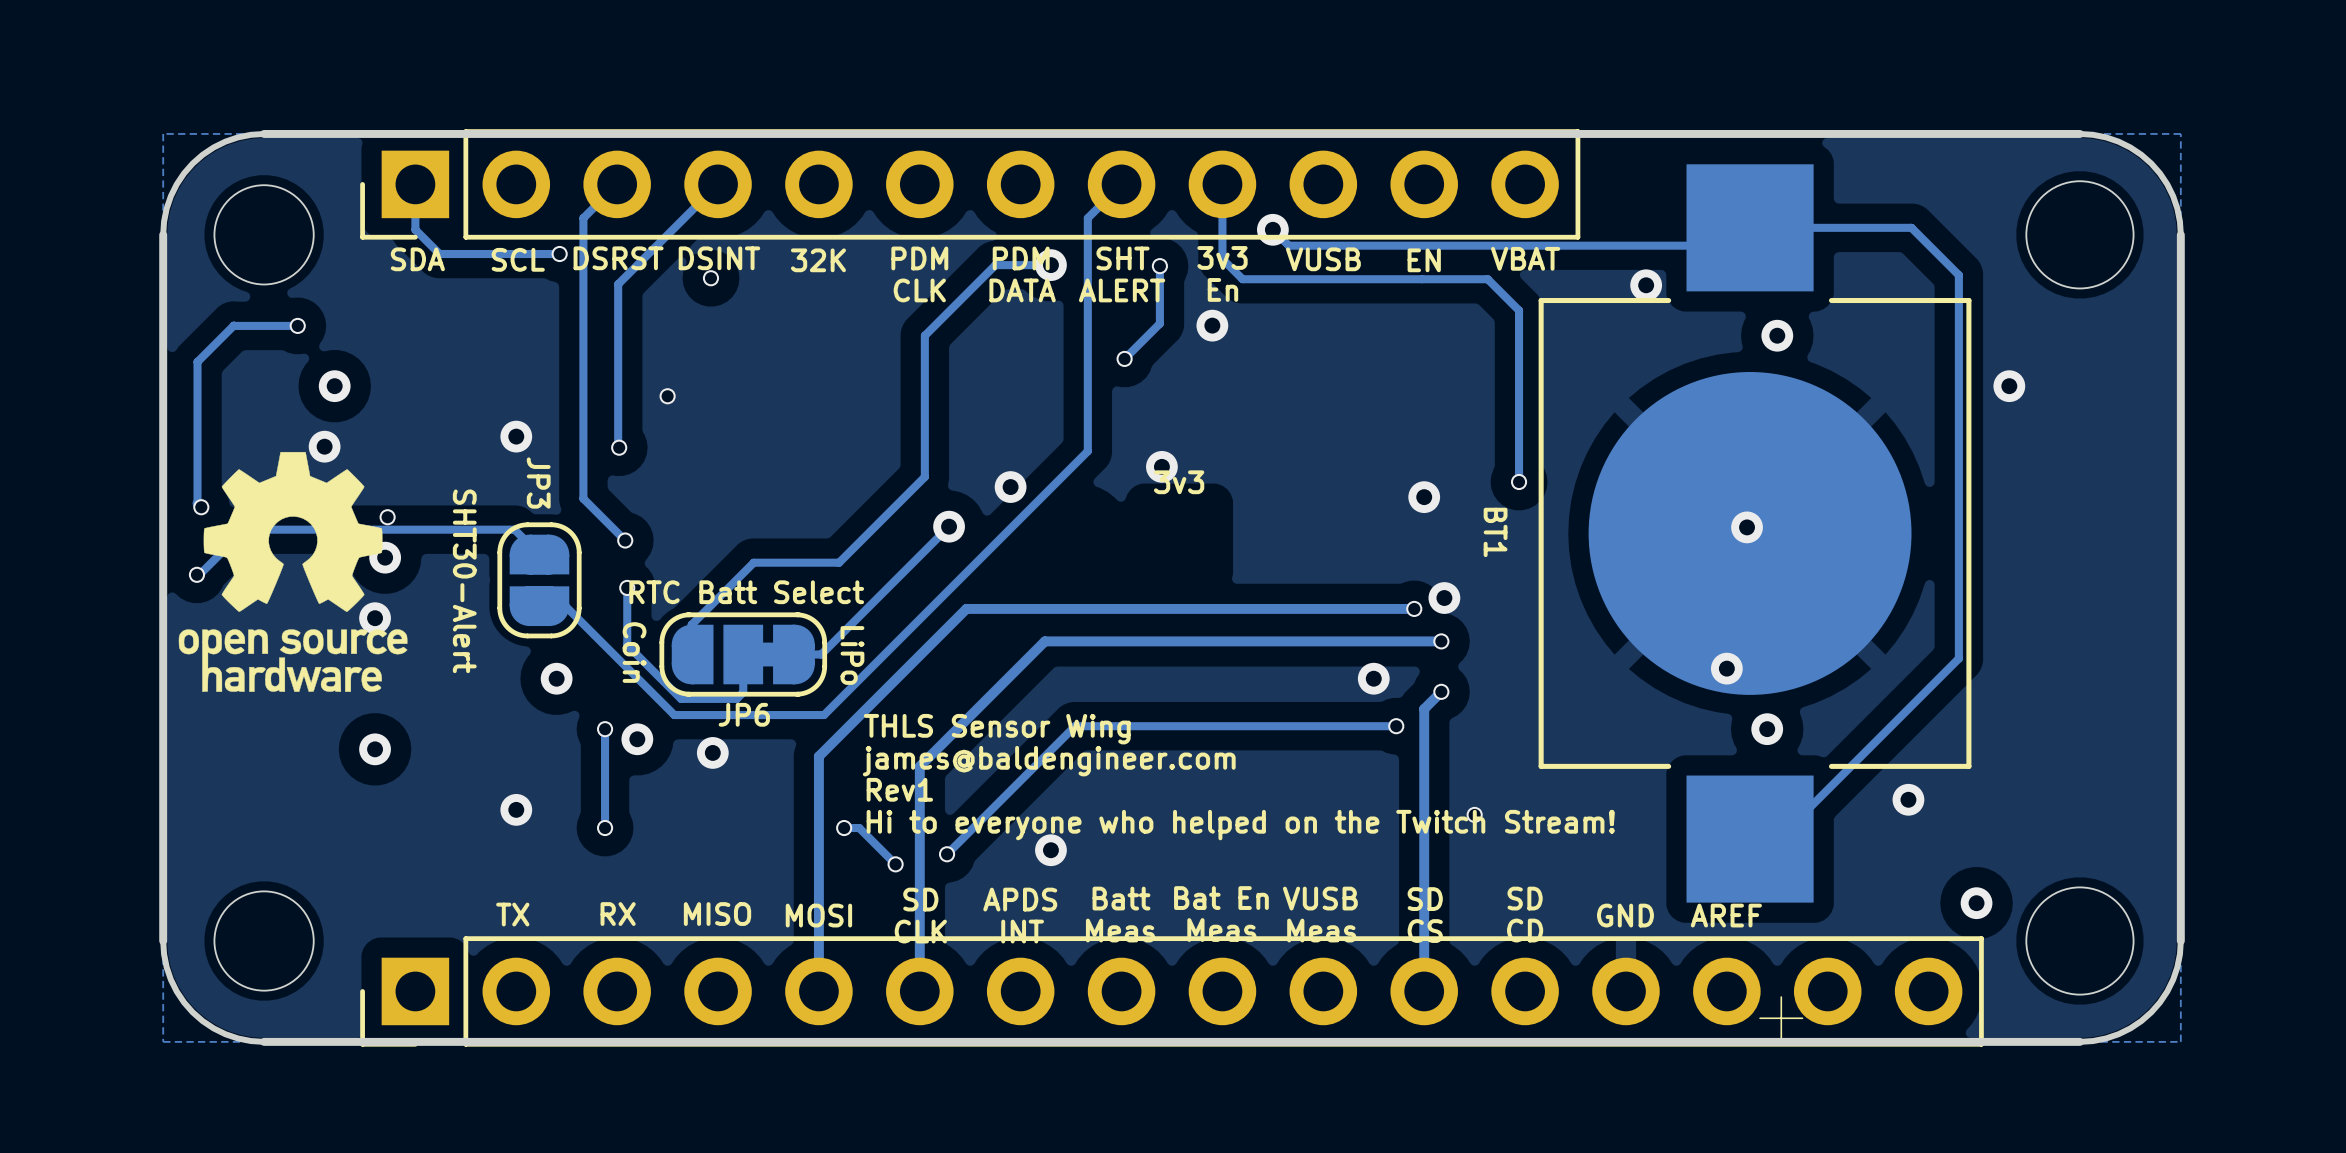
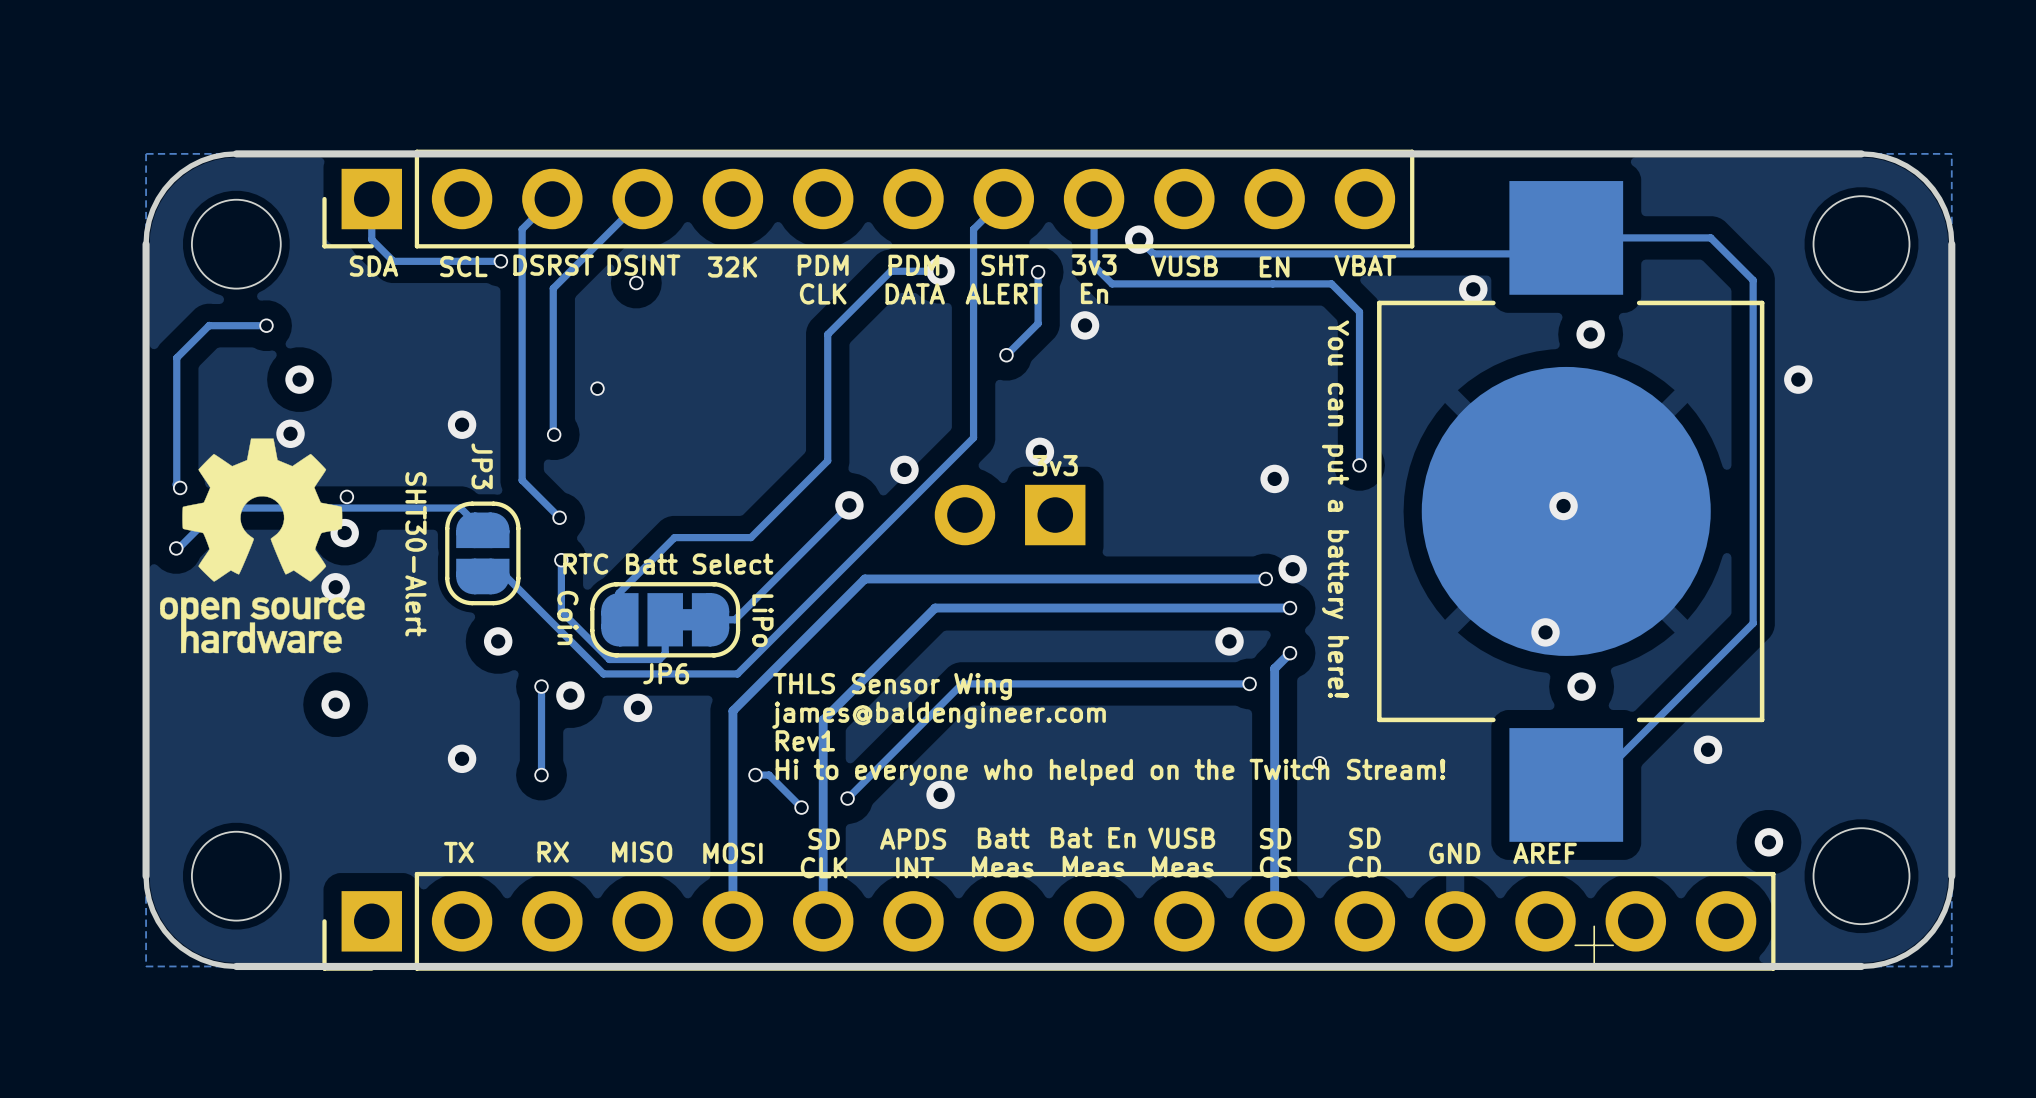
BT1 name: BT1 (1495, 532) -> You can put a battery here! (1335, 509)
part: none -> (1010, 515)

